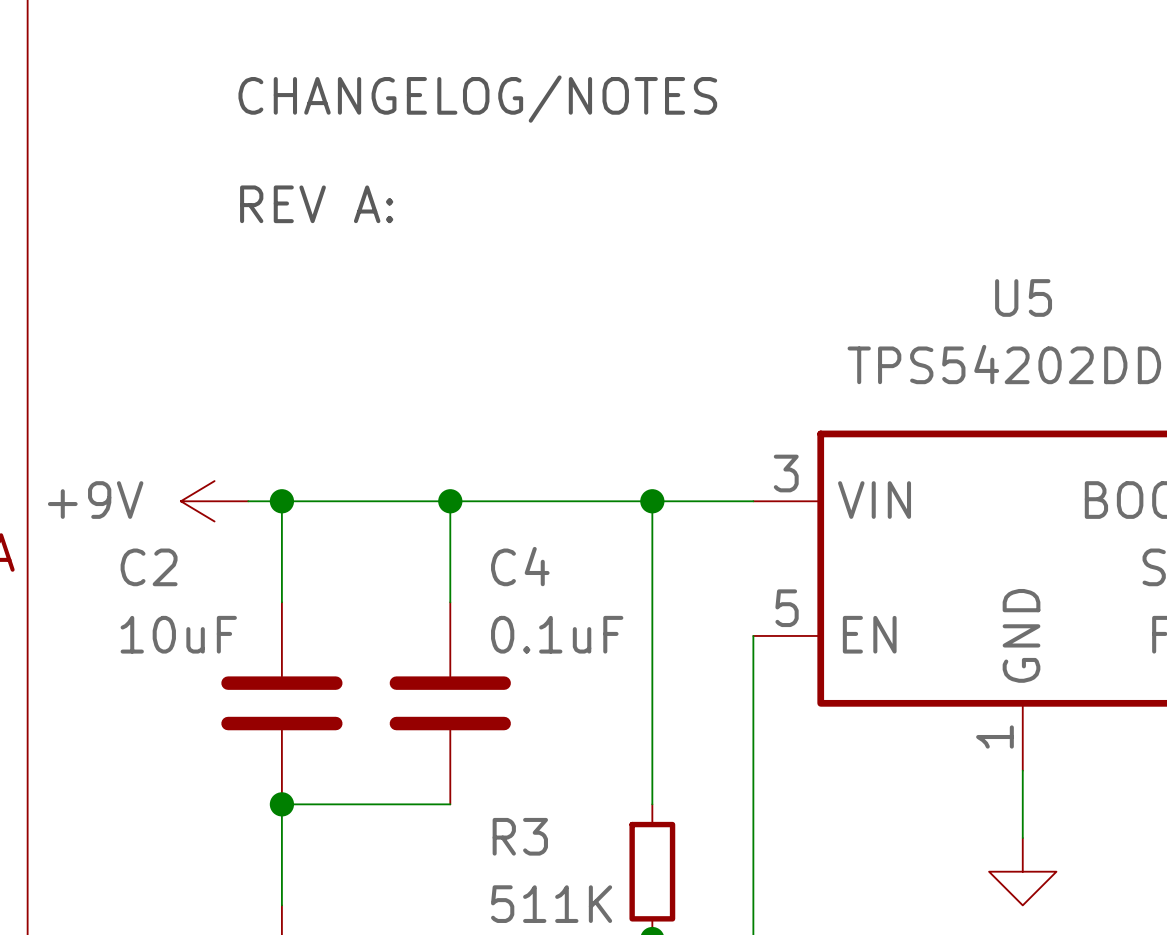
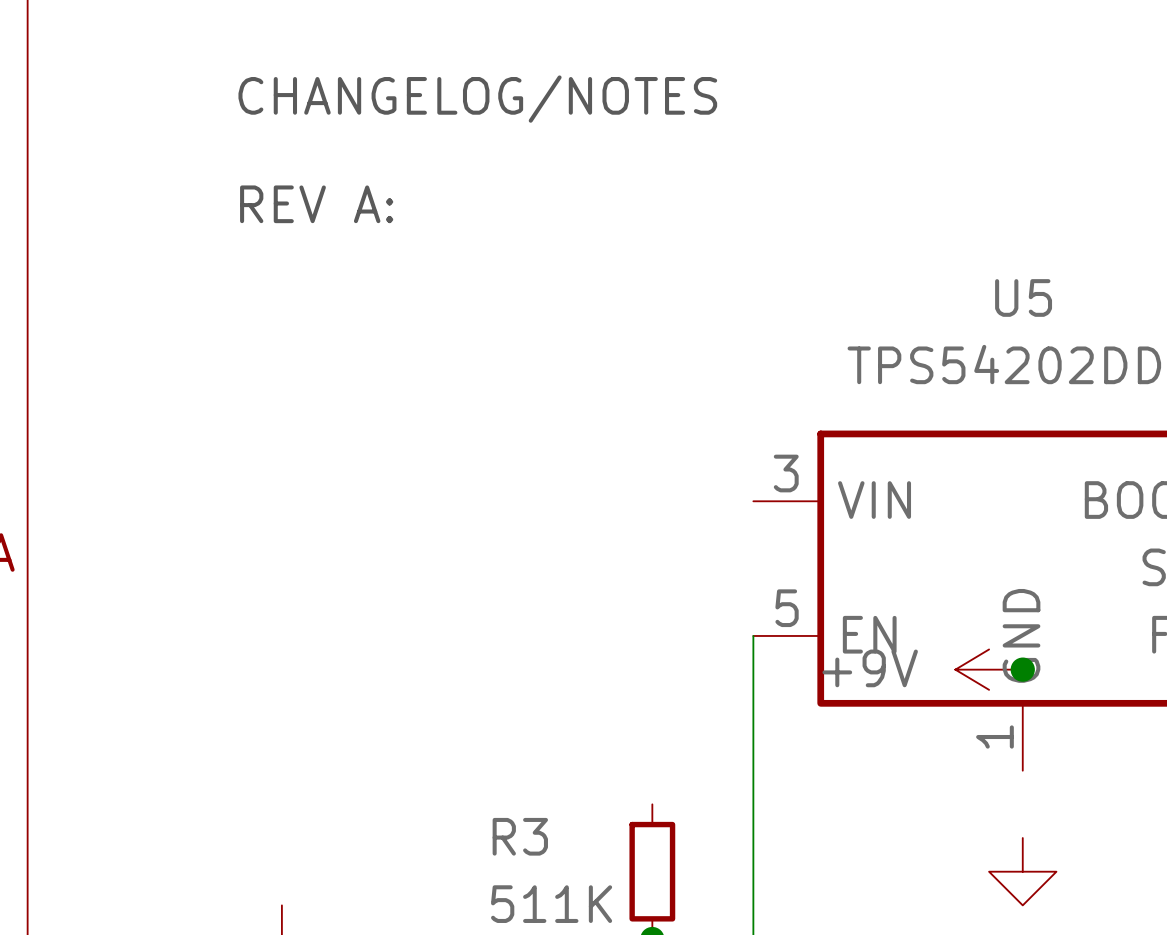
power symbol: +9V (214, 501) -> none
wire: (248, 501) (753, 501) -> none
wire: (281, 501) (281, 602) -> none
junction: (281, 501) -> none
wire: (450, 501) (450, 602) -> none
junction: (450, 501) -> none
wire: (652, 501) (652, 804) -> none
junction: (652, 501) -> none
power symbol: none -> +9V (989, 669)
junction: none -> (1022, 669)
C2: 10uF (281, 703) -> none
C4: 0.1uF (450, 703) -> none
wire: (1022, 770) (1022, 838) -> none
junction: (281, 804) -> none
wire: (450, 804) (281, 804) (281, 905) -> none

